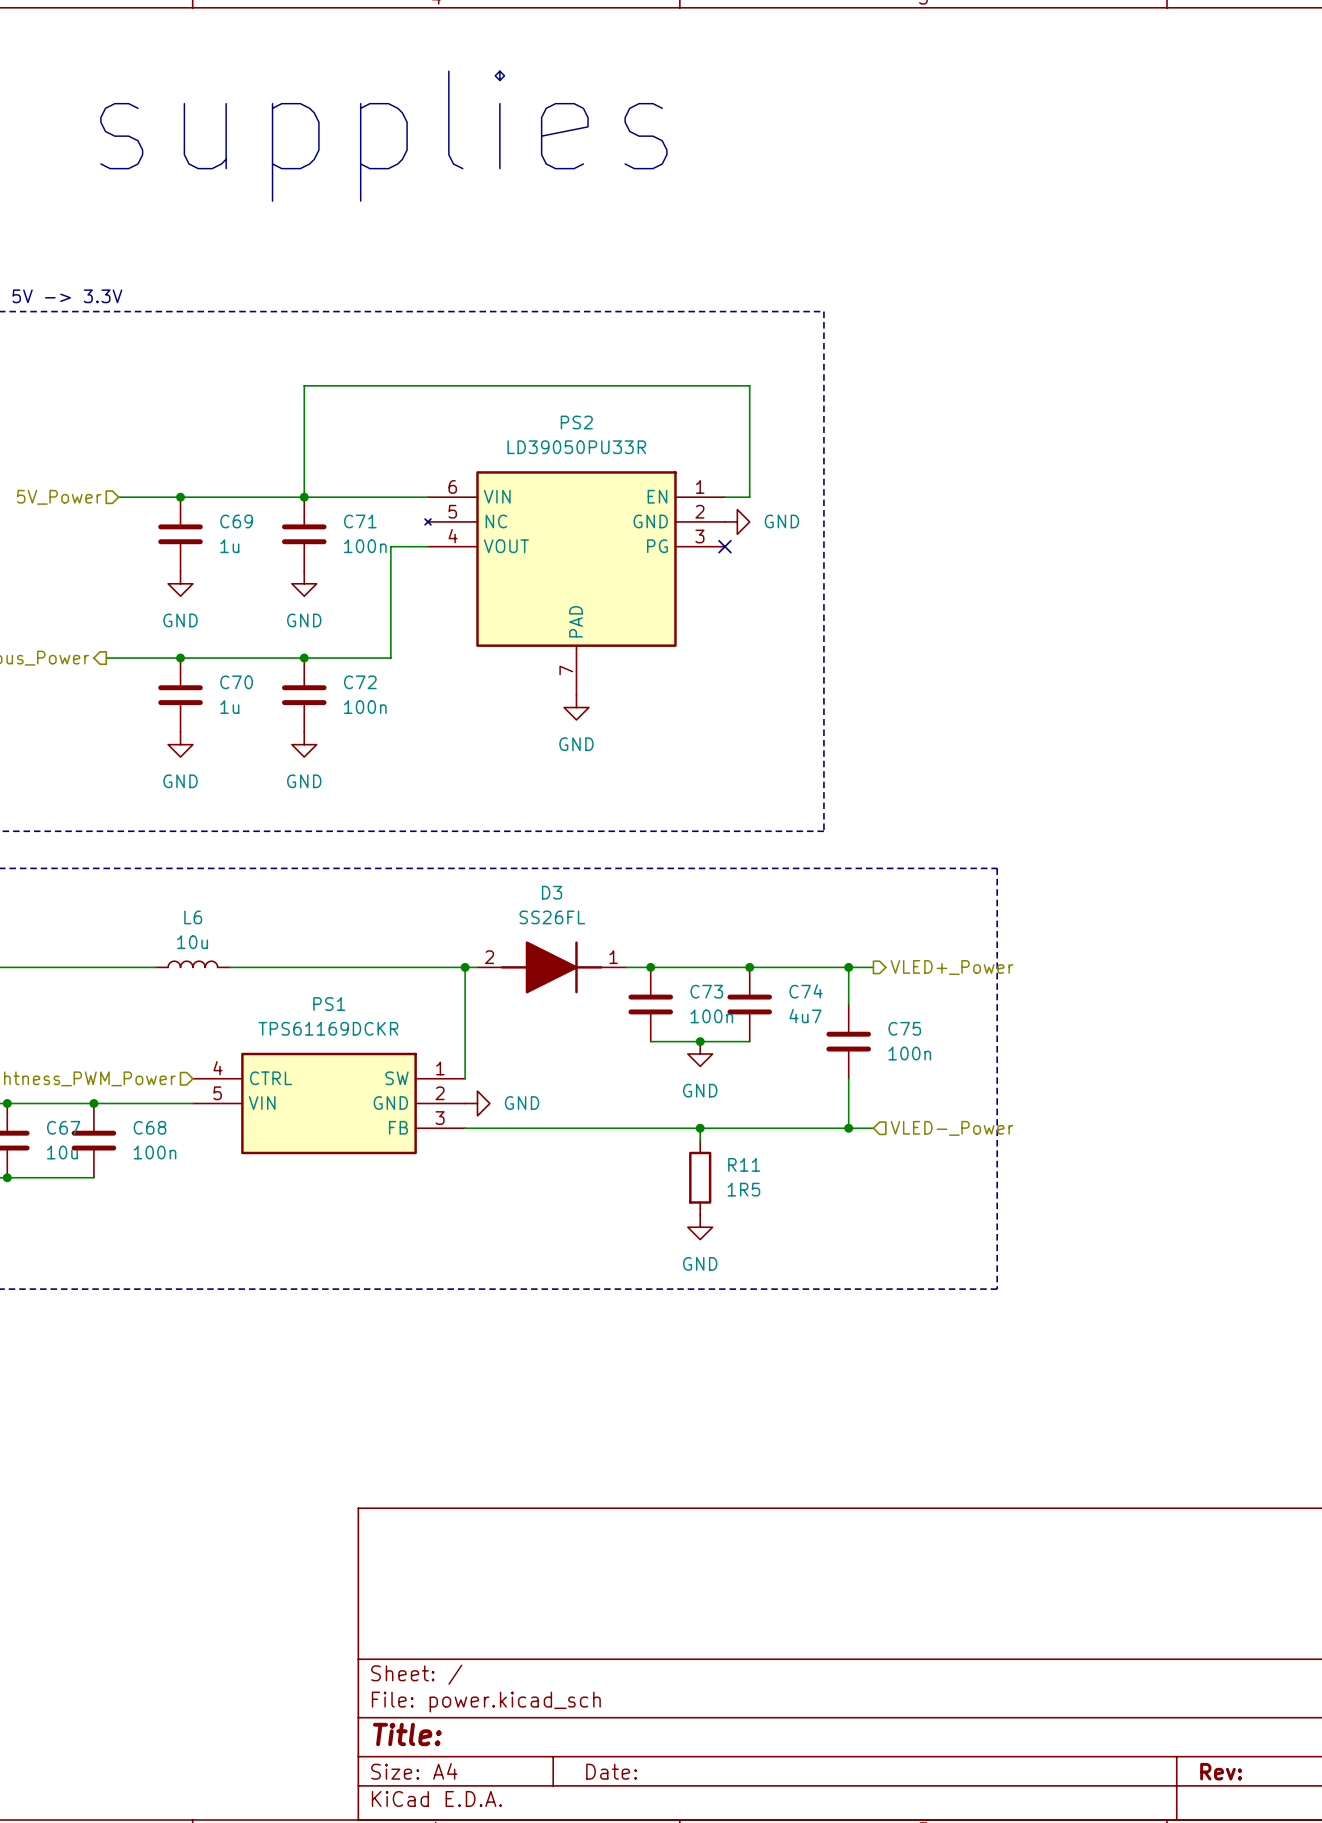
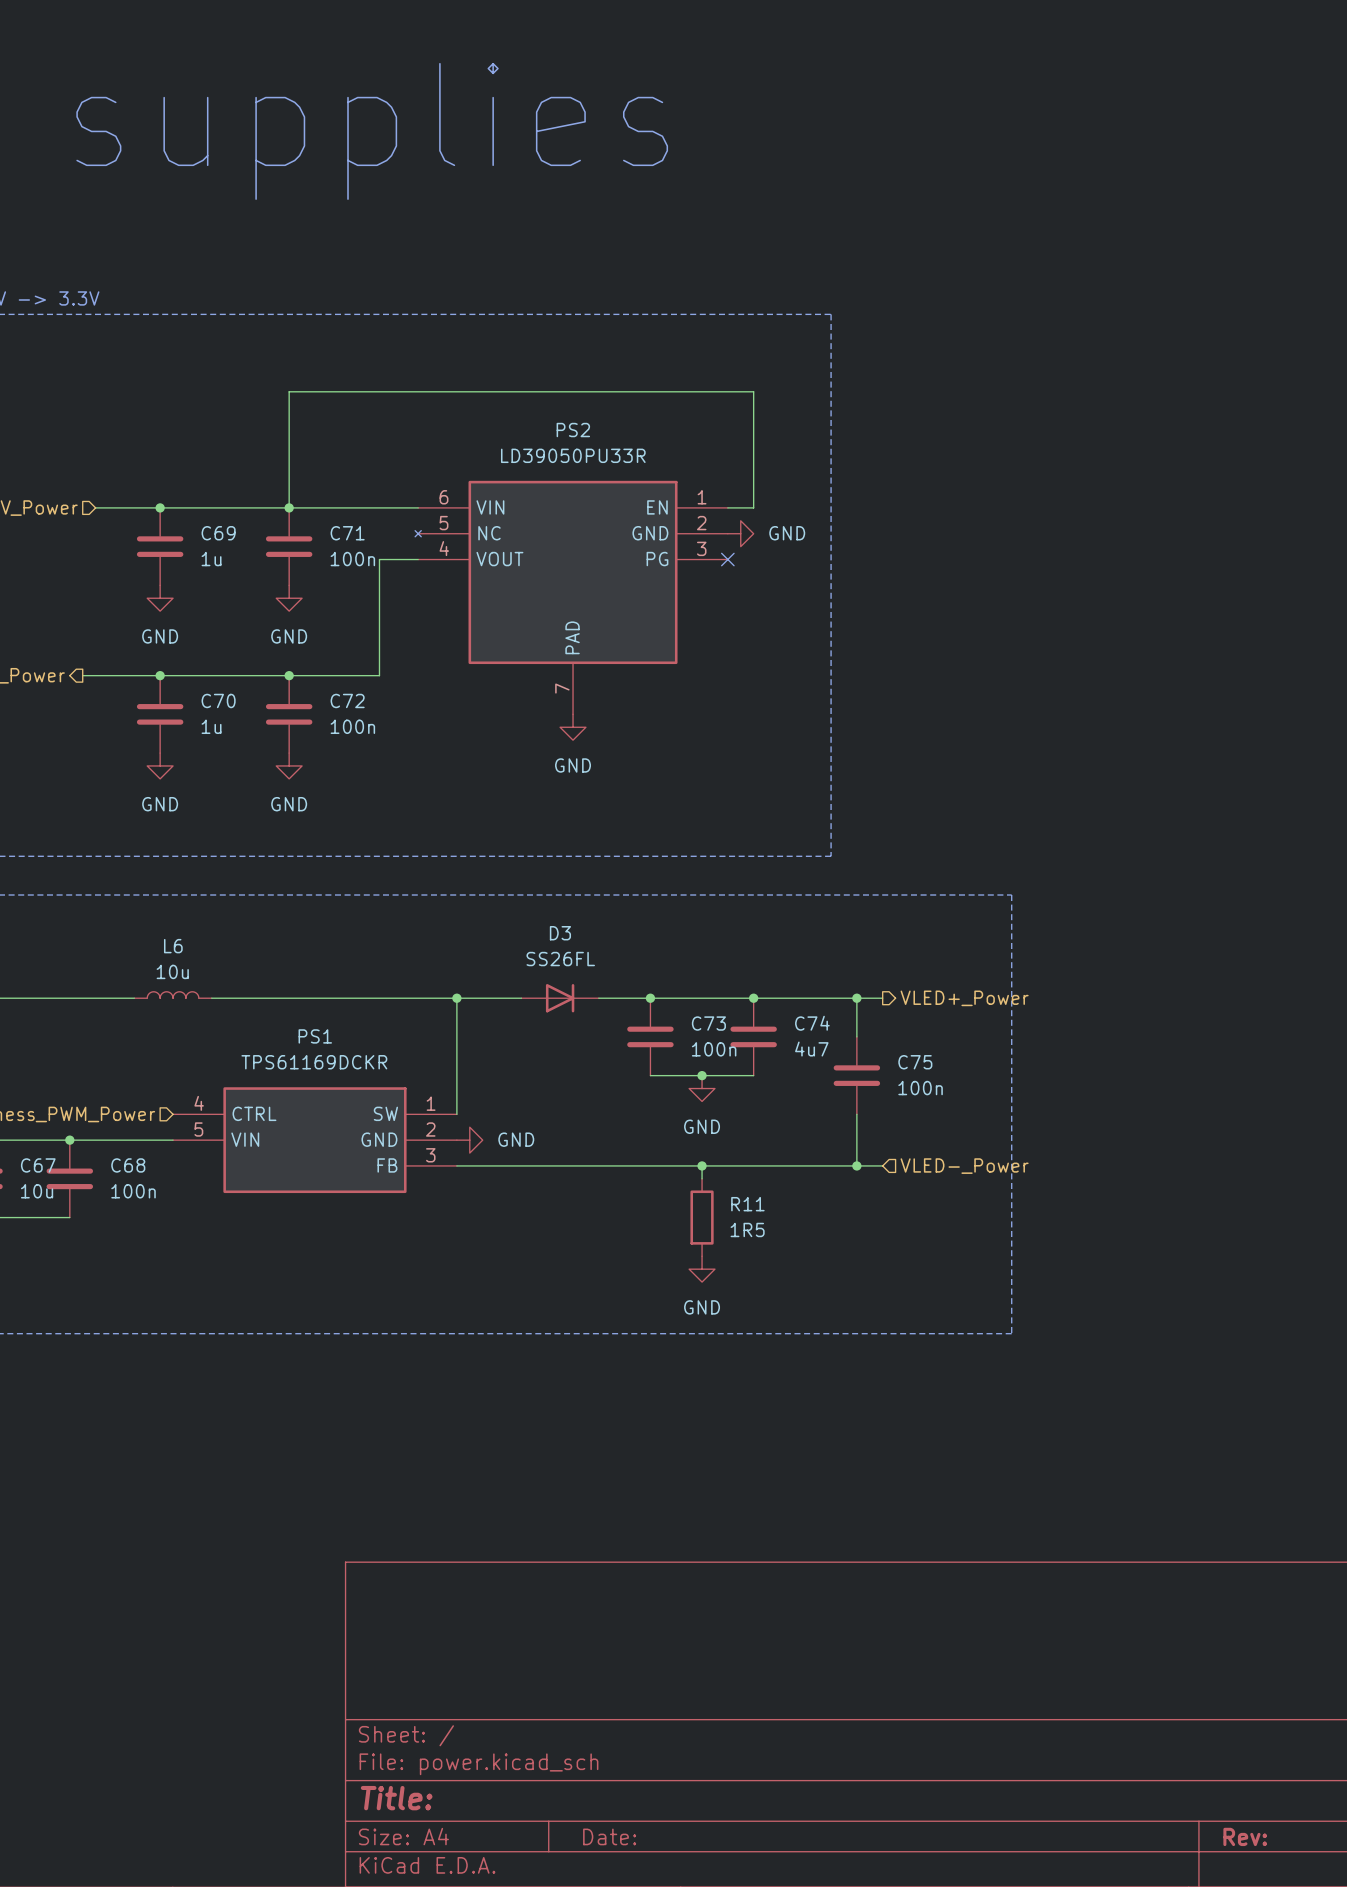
D3 symbol: [477, 941, 626, 994] -> [521, 984, 599, 1013]

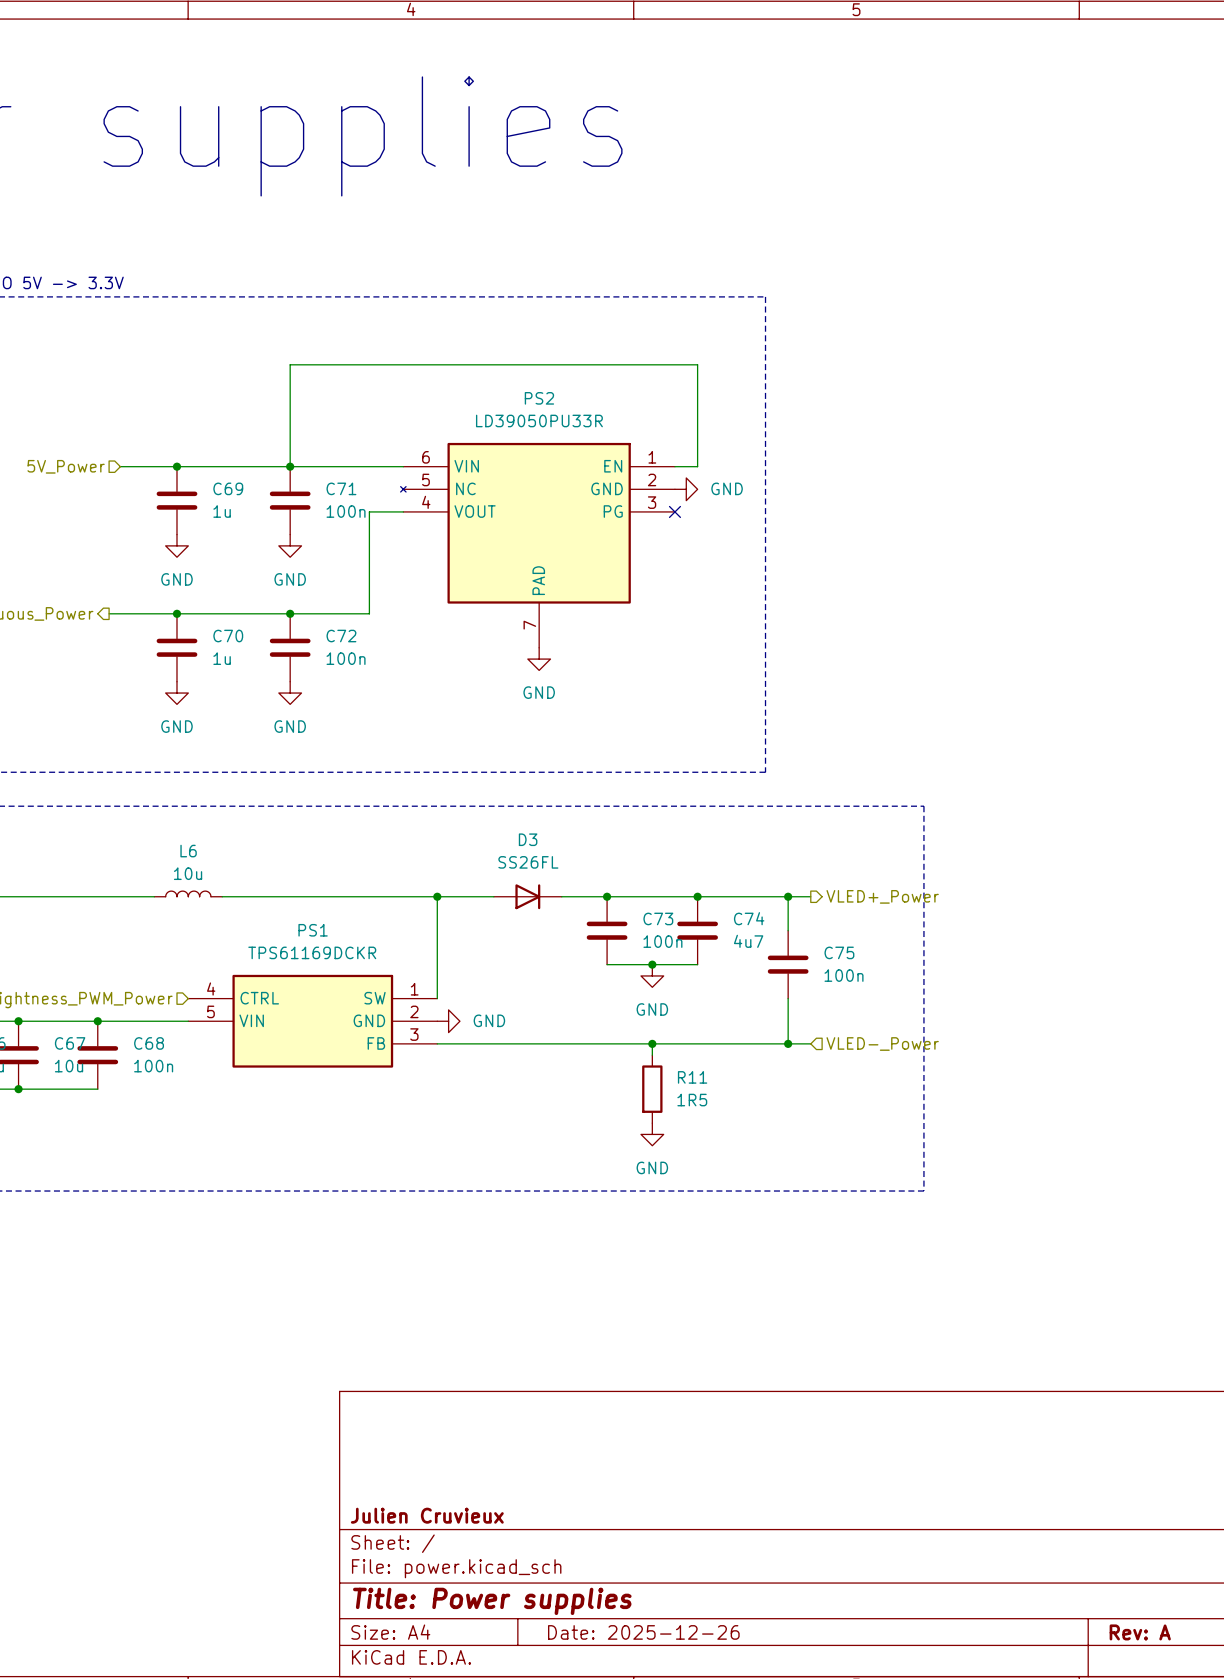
title block: none -> Julien Cruvieux (427, 1515)
title block: Title: (396, 1798) -> Title: Power supplies (492, 1601)
title block: Date: (609, 1836) -> Date: 2025-12-26 (643, 1632)
title block: Rev: (1245, 1836) -> Rev: A (1140, 1632)

